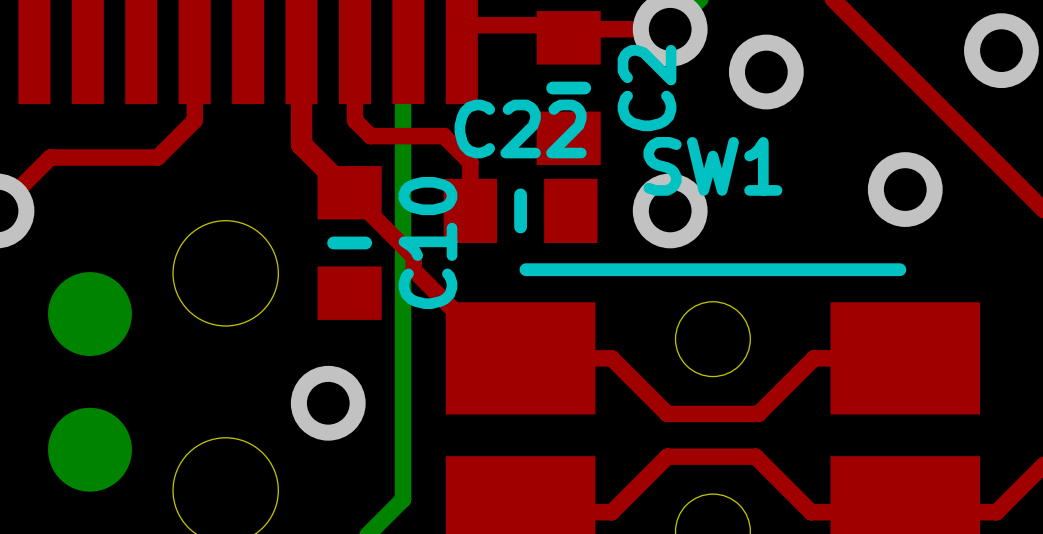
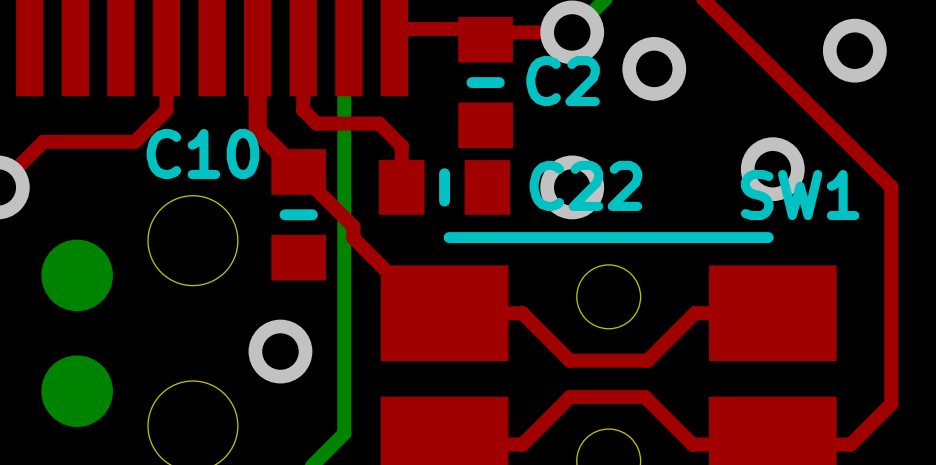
C2 name rotation: 0° (647, 88) -> 90° clockwise (563, 81)
C22 name position: C22 (520, 128) -> C22 (585, 185)
SW1 name position: SW1 (712, 166) -> SW1 (800, 195)
C10 name rotation: 0° (427, 242) -> 90° clockwise (202, 153)
C10 name position: C10 (427, 242) -> C10 (202, 153)

